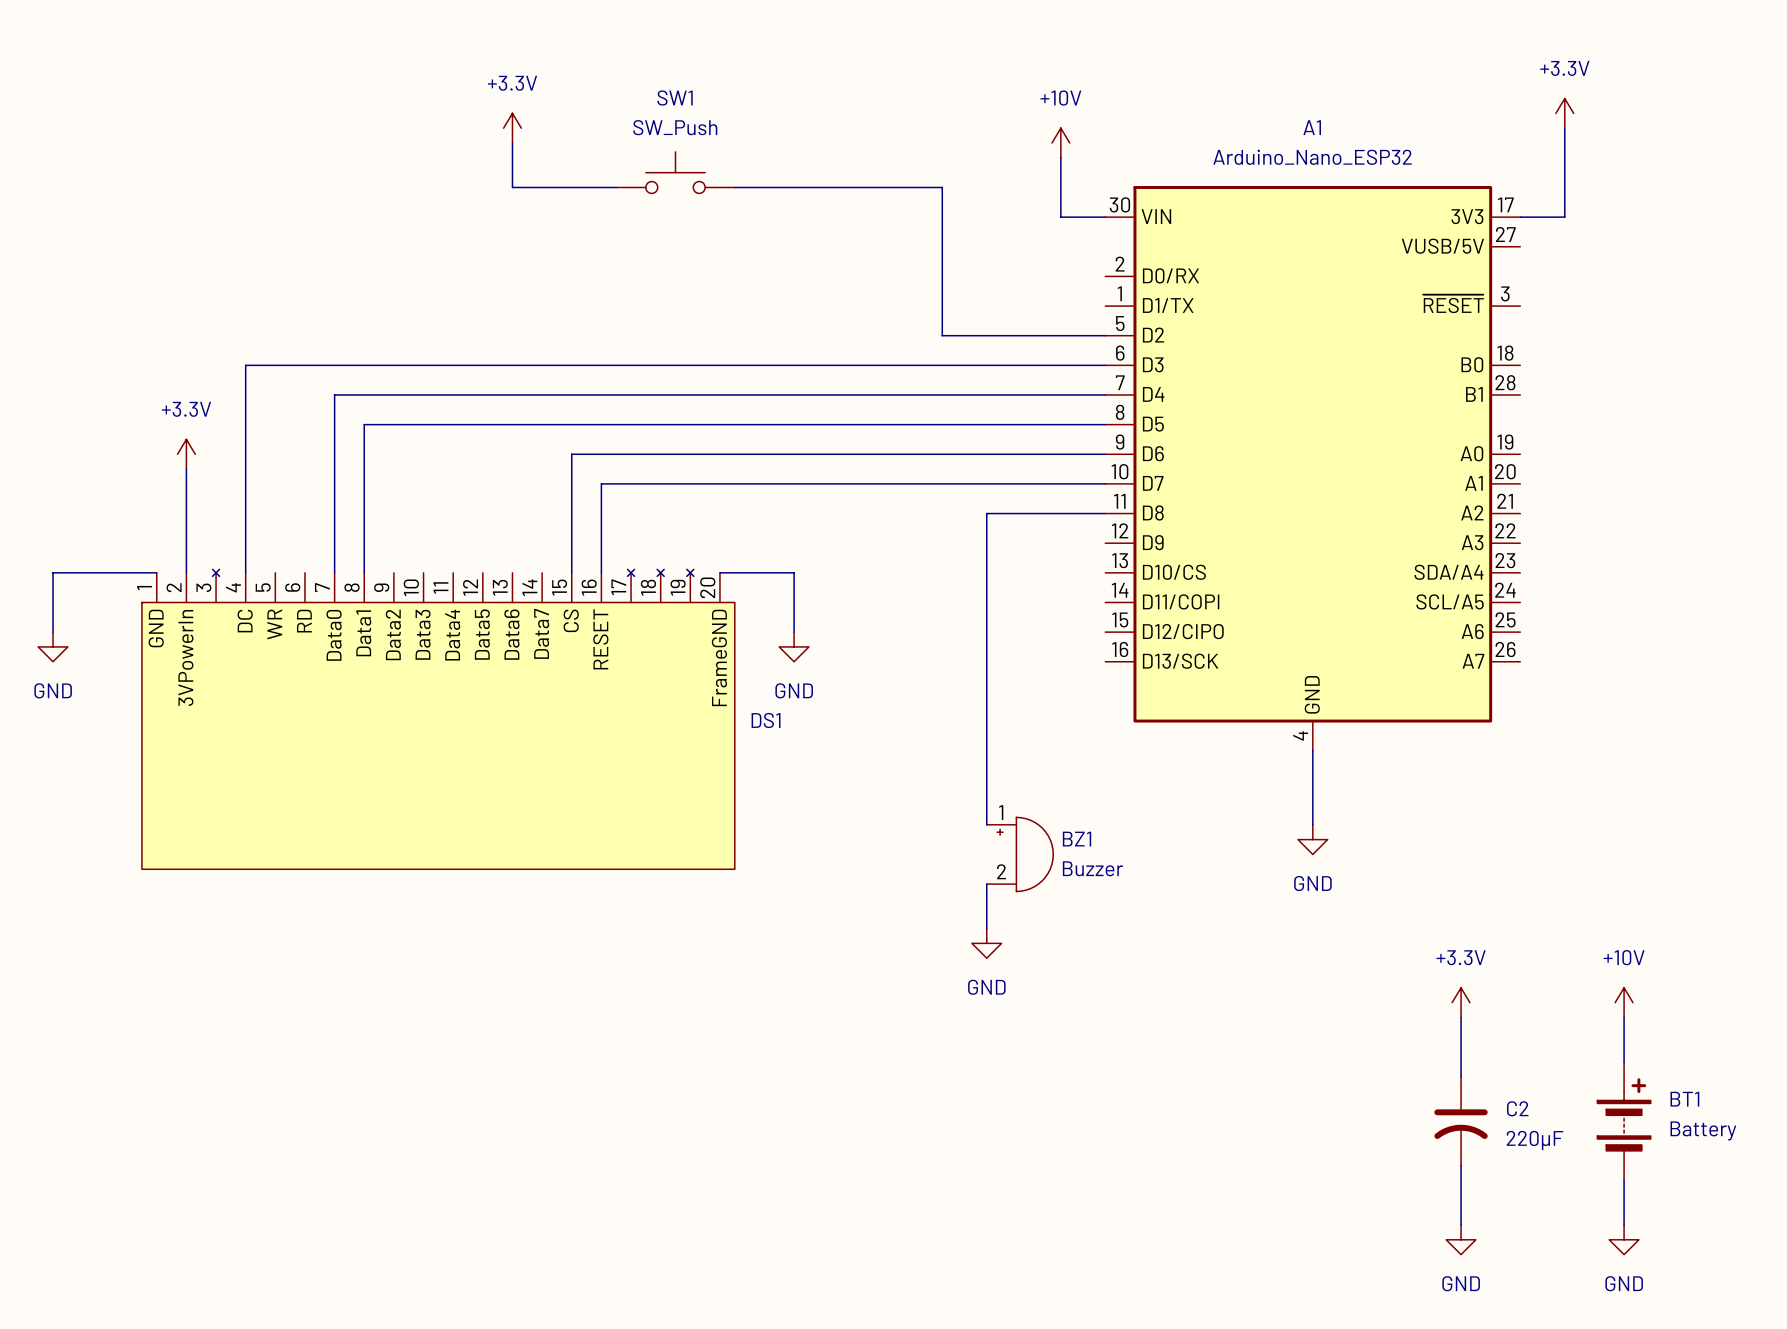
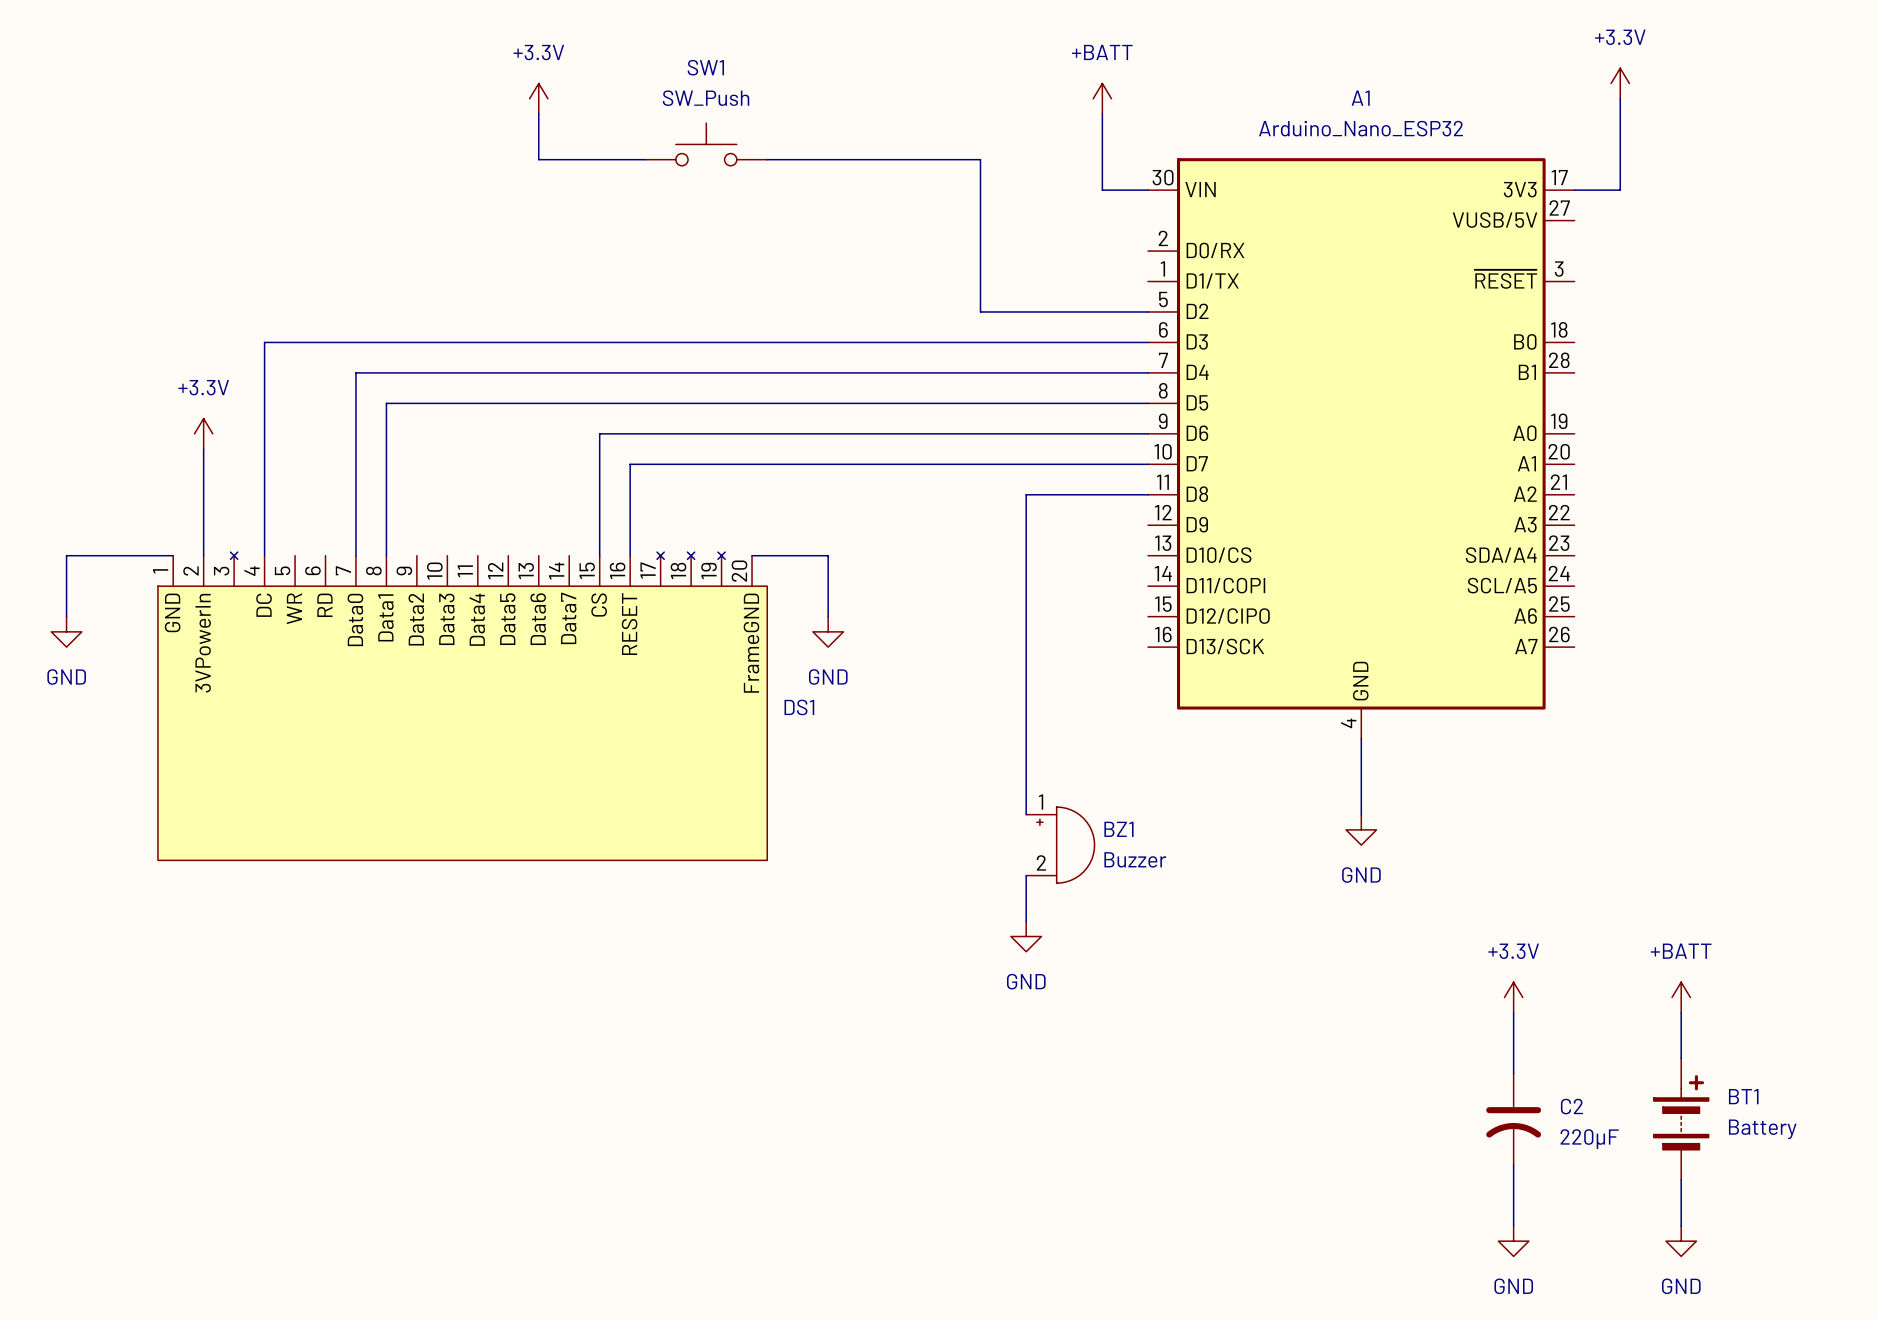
power symbol: none -> +BATT (1102, 98)
power symbol: +10V (1060, 143) -> none
power symbol: +10V (1624, 1002) -> +BATT (1681, 997)

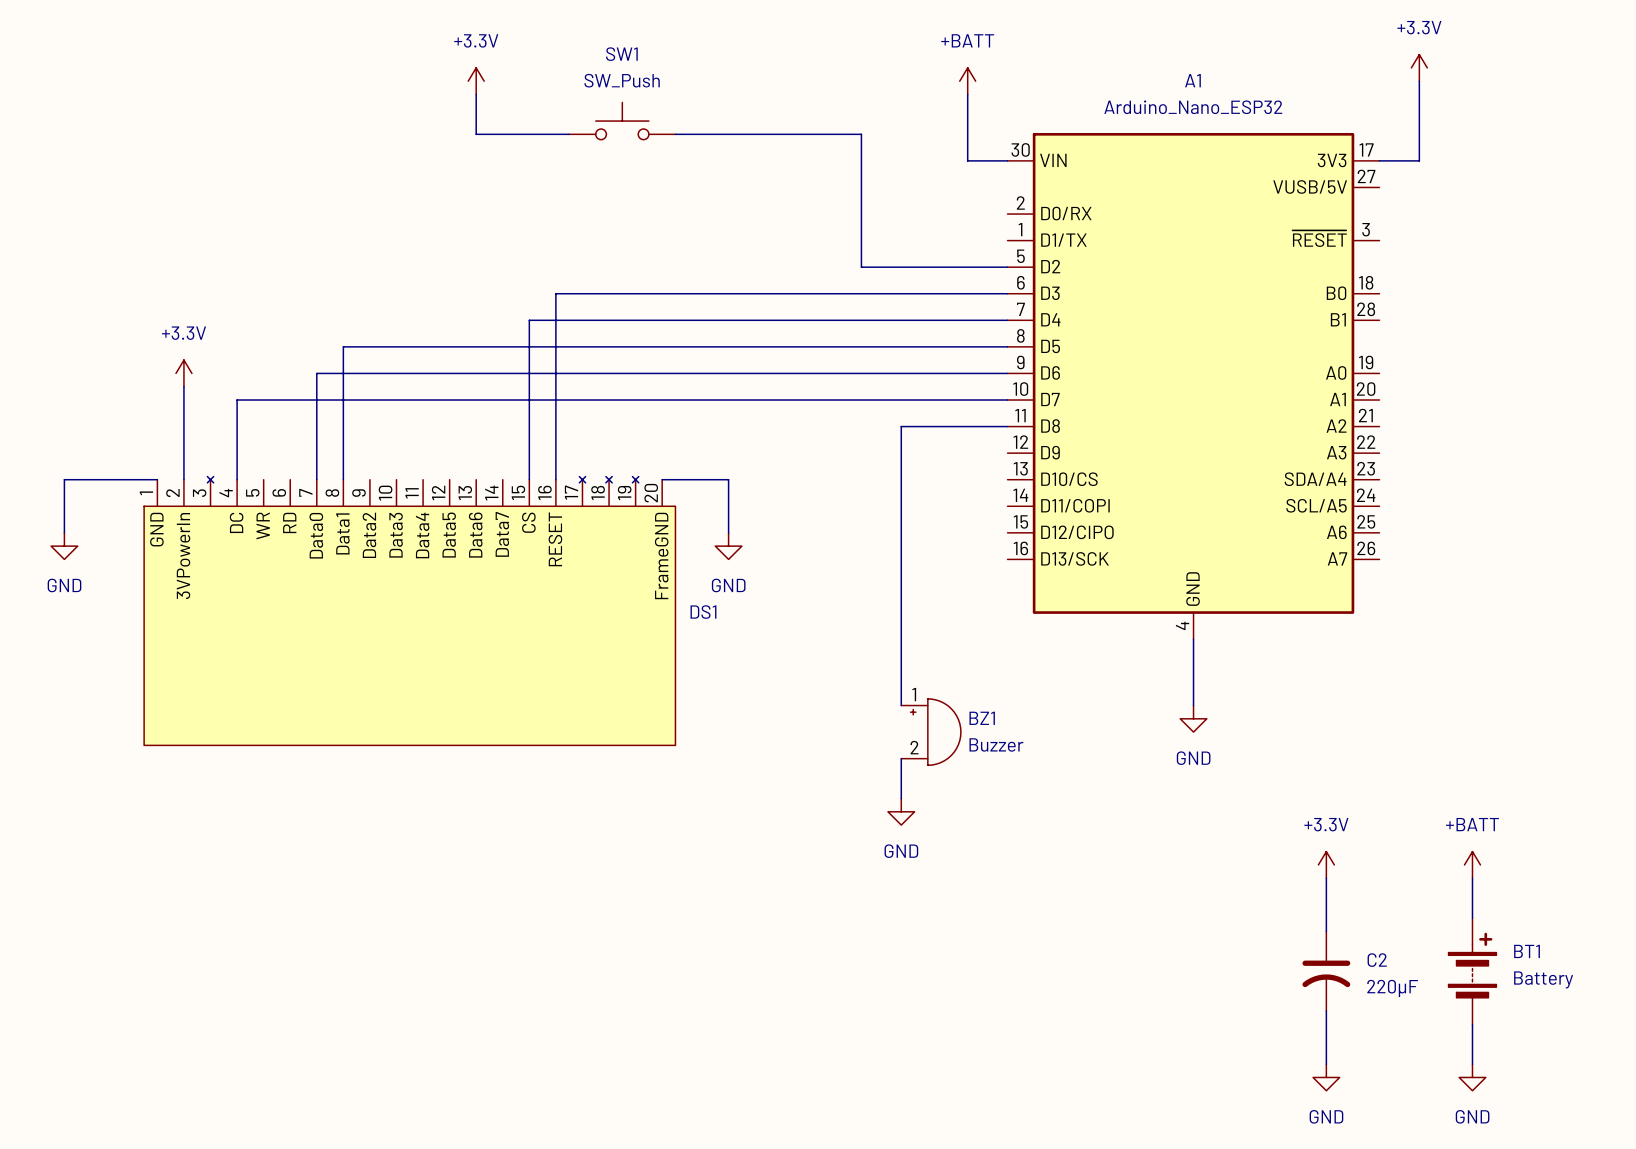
wire: (630, 342) (264, 342) (264, 464) -> (555, 293) (555, 400) (237, 400)
wire: (599, 372) (355, 372) (355, 433) -> (529, 320) (529, 373) (316, 373)

